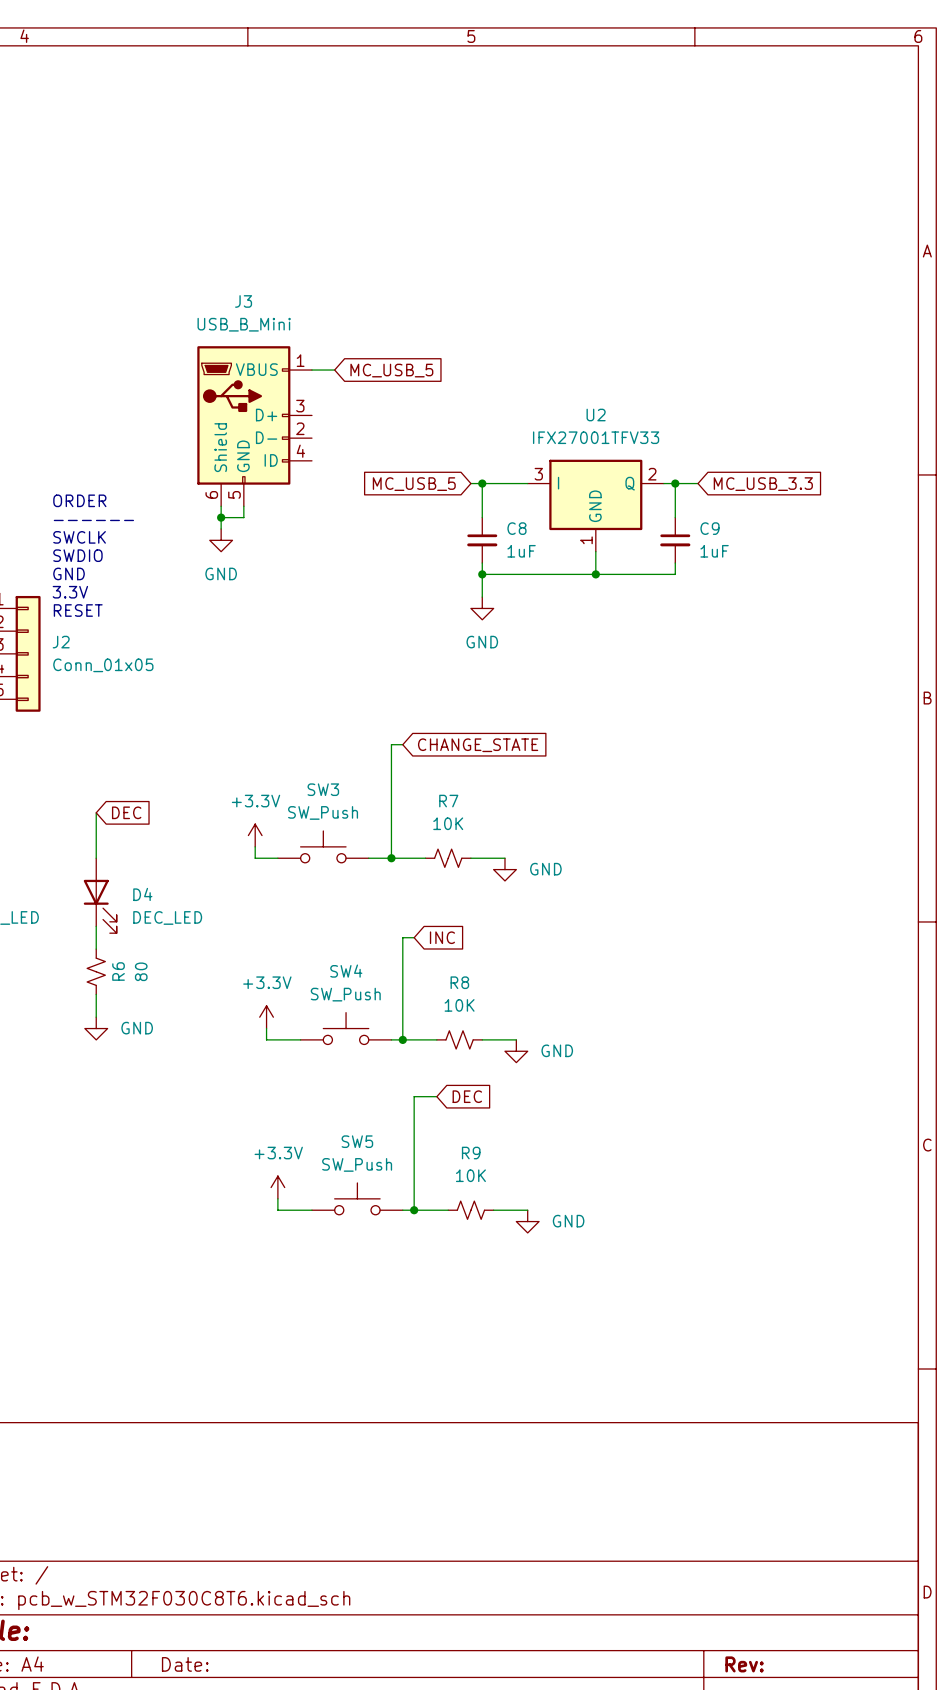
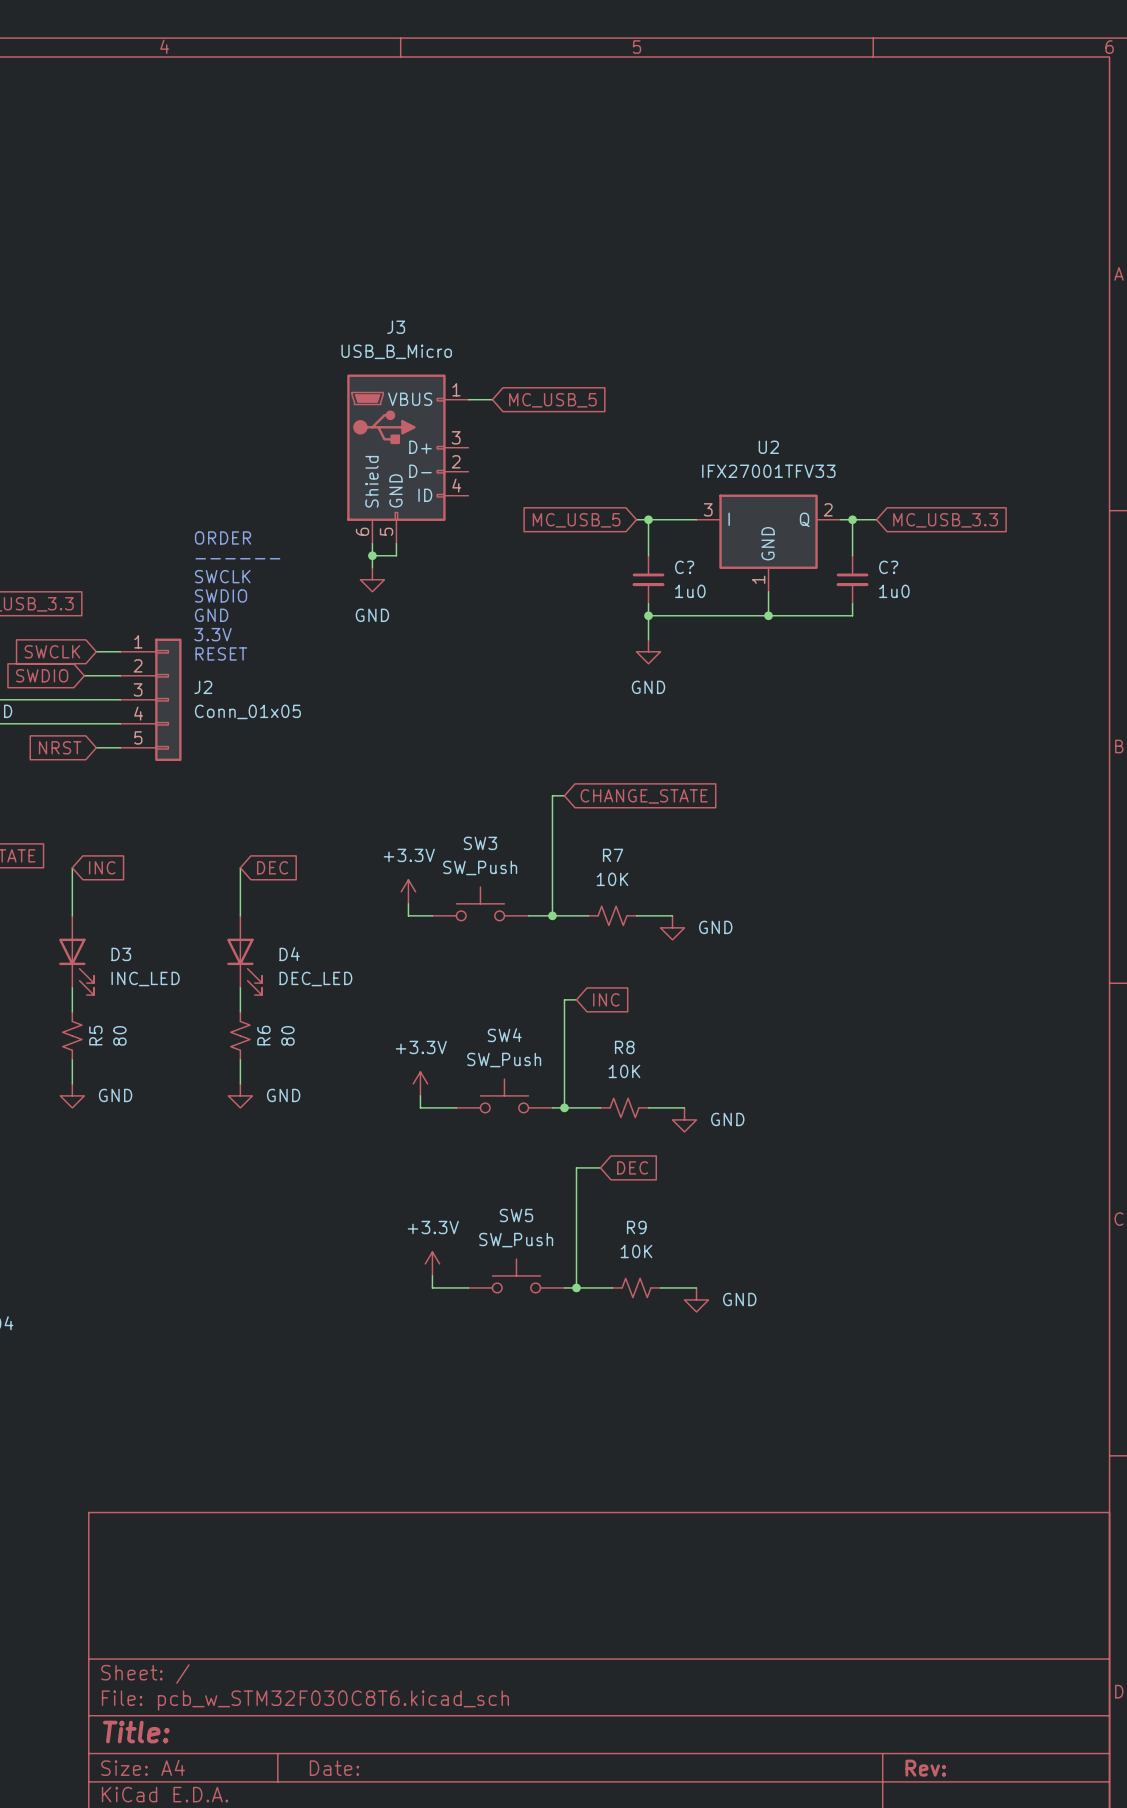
J3 value: USB_B_Mini (244, 324) -> USB_B_Micro (396, 351)
C8 name: C8 (516, 528) -> C? (684, 567)
C9 name: C9 (709, 528) -> C? (888, 567)
C8 value: 1uF (521, 551) -> 1u0 (690, 591)
C9 value: 1uF (714, 551) -> 1u0 (894, 591)

